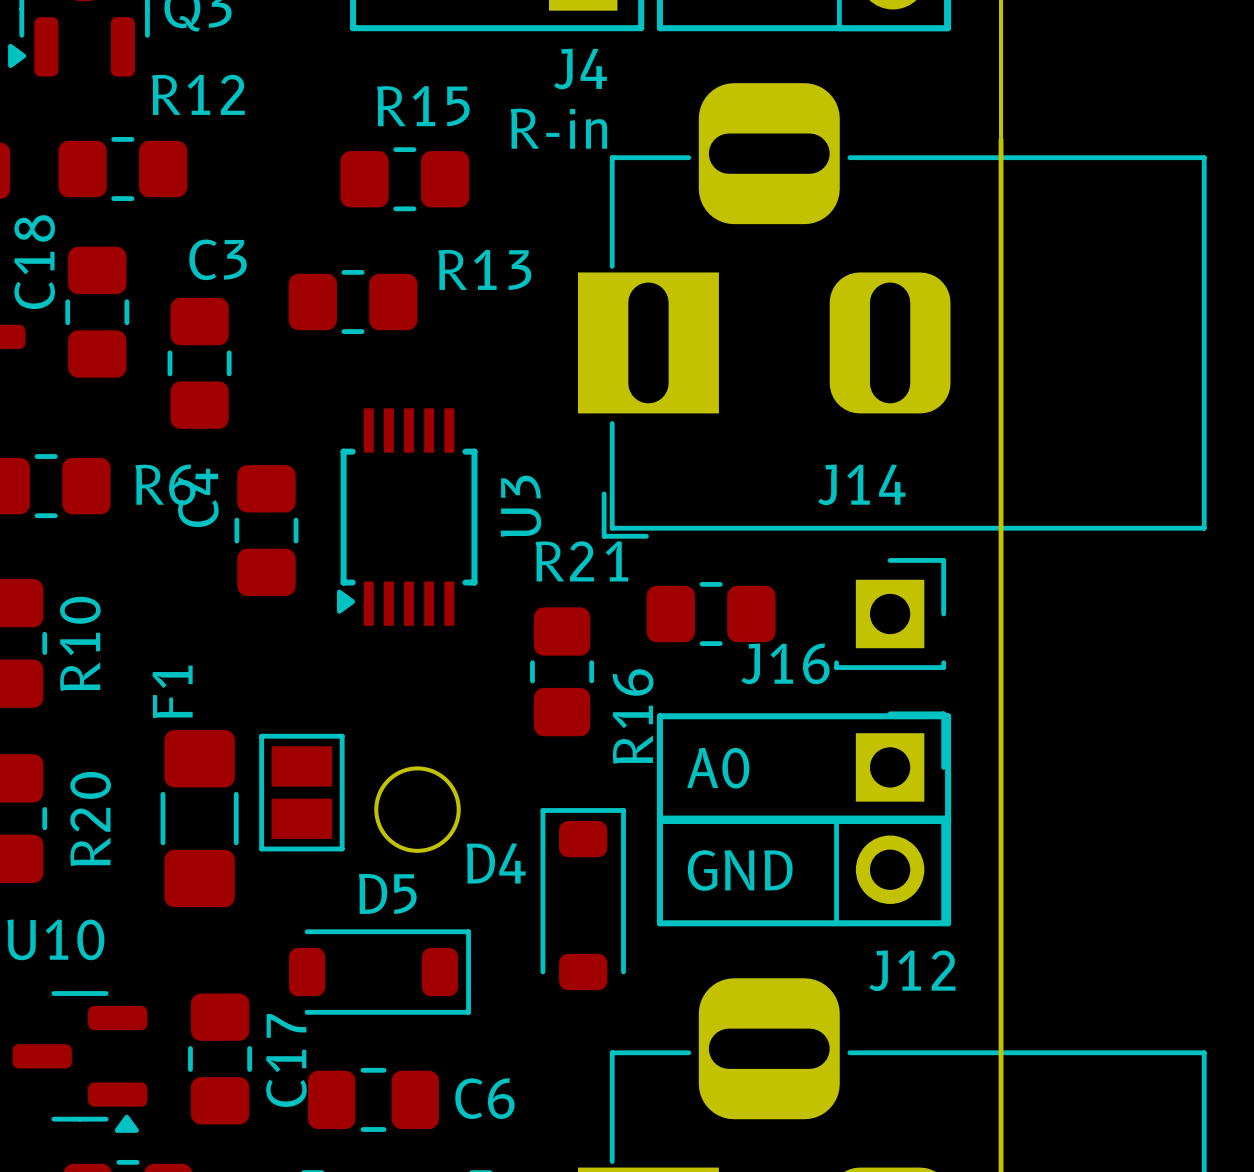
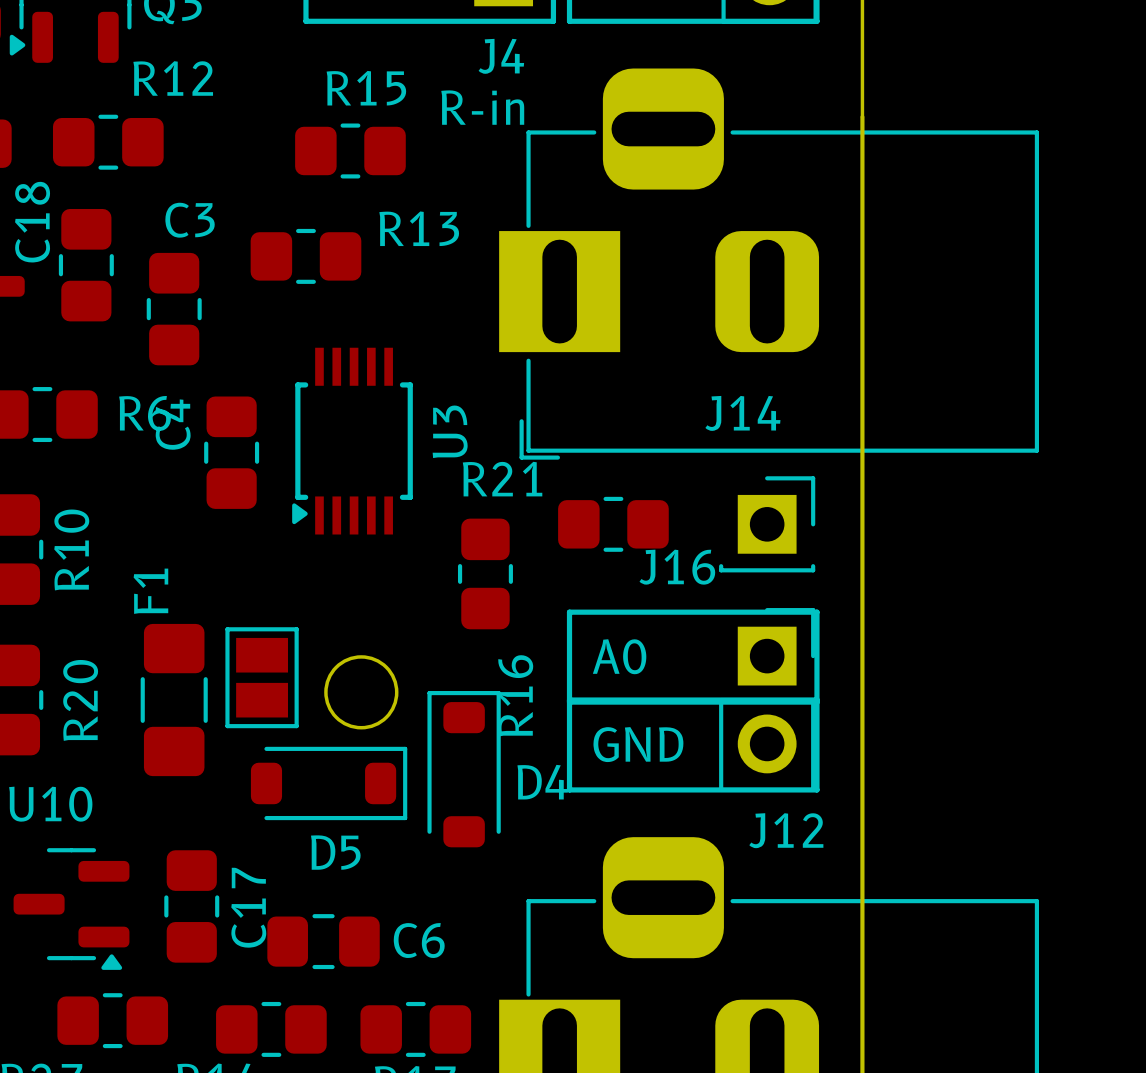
R16 name position: R16 (633, 716) -> R16 (515, 695)
D4 name position: D4 (496, 863) -> D4 (542, 782)
D5 name position: D5 (387, 893) -> D5 (335, 852)
D4 position: (583, 899) -> (464, 769)
D5 position: (379, 972) -> (329, 783)

